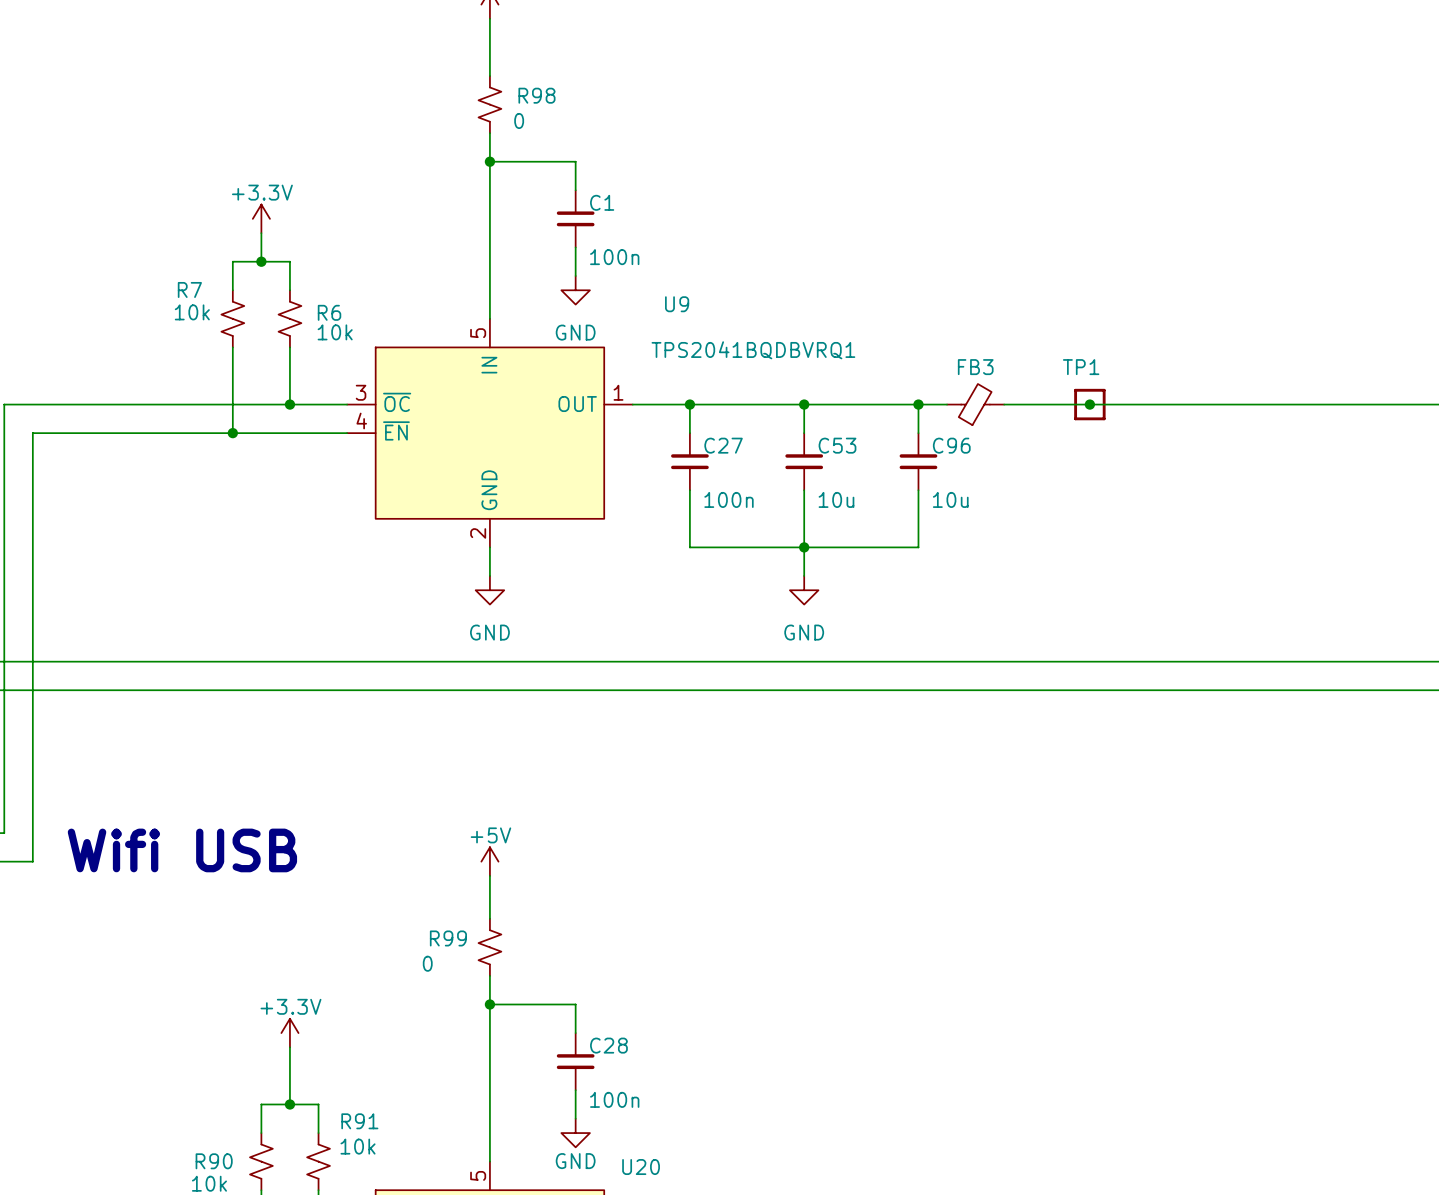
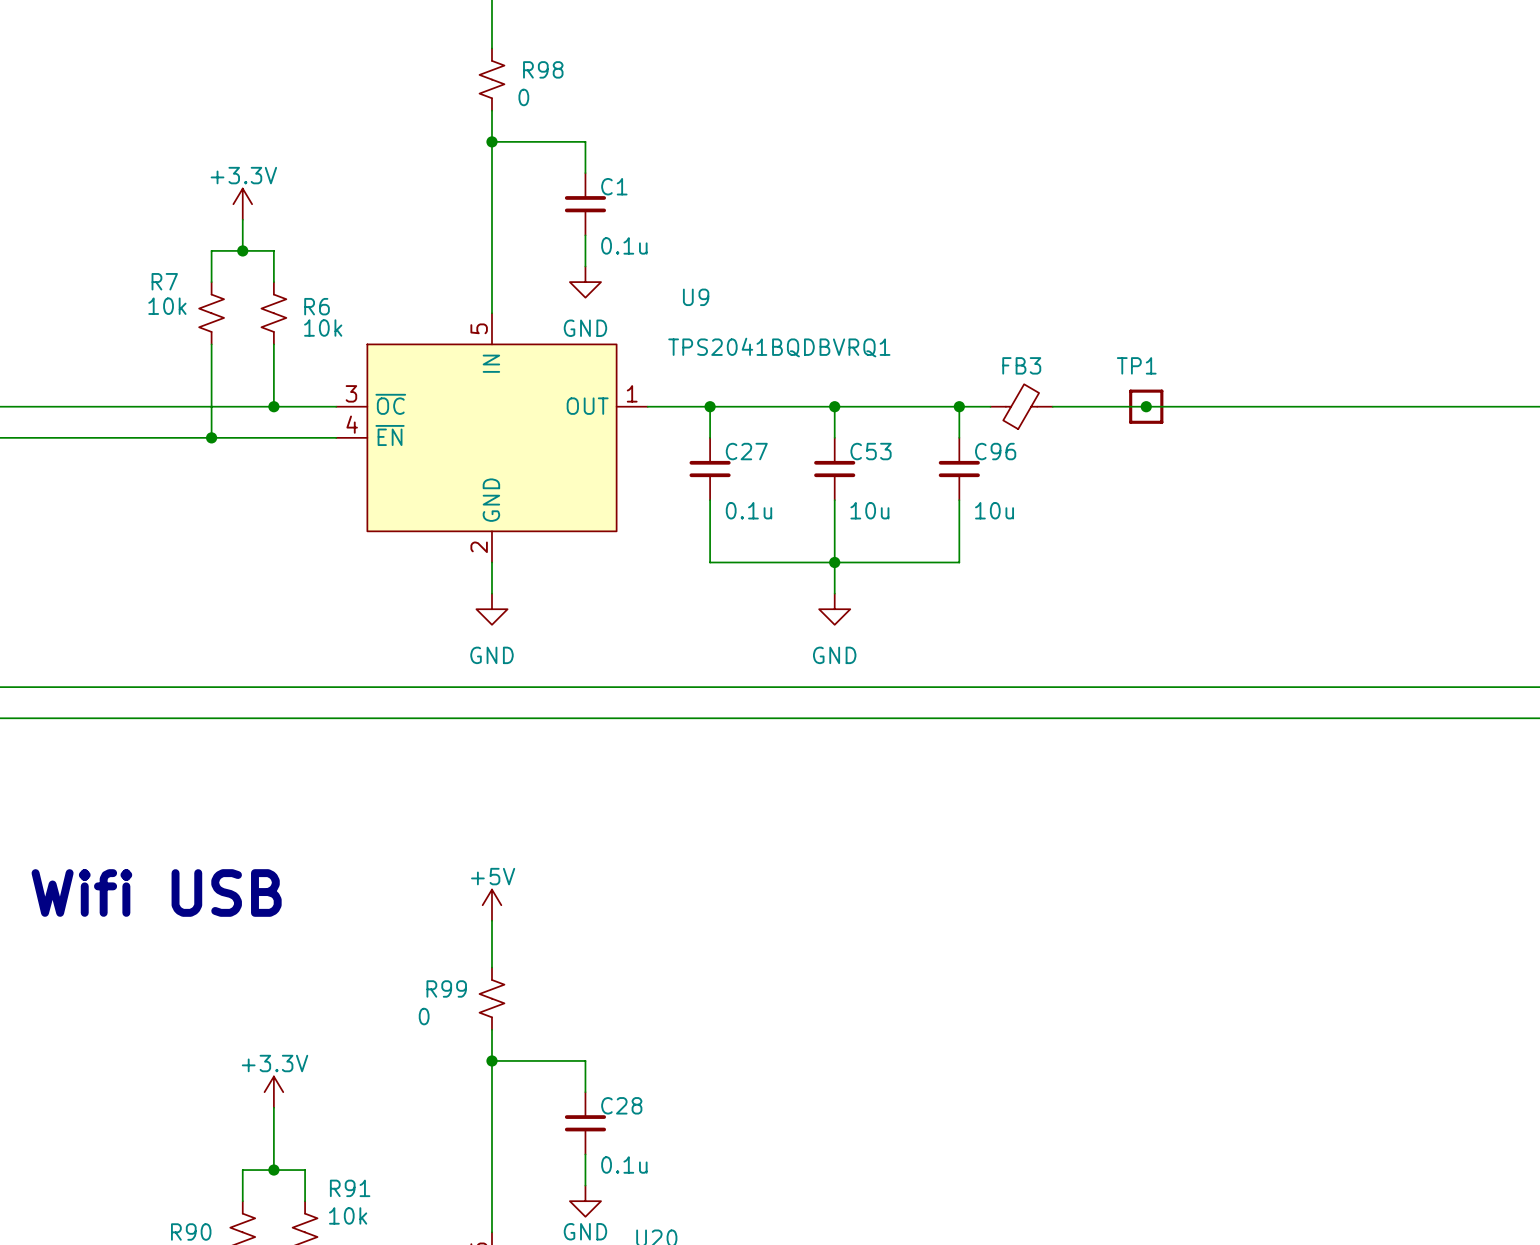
C1 value: 100n (614, 257) -> 0.1u (624, 245)
C27 value: 100n (729, 499) -> 0.1u (748, 510)
C28 value: 100n (614, 1099) -> 0.1u (624, 1165)

